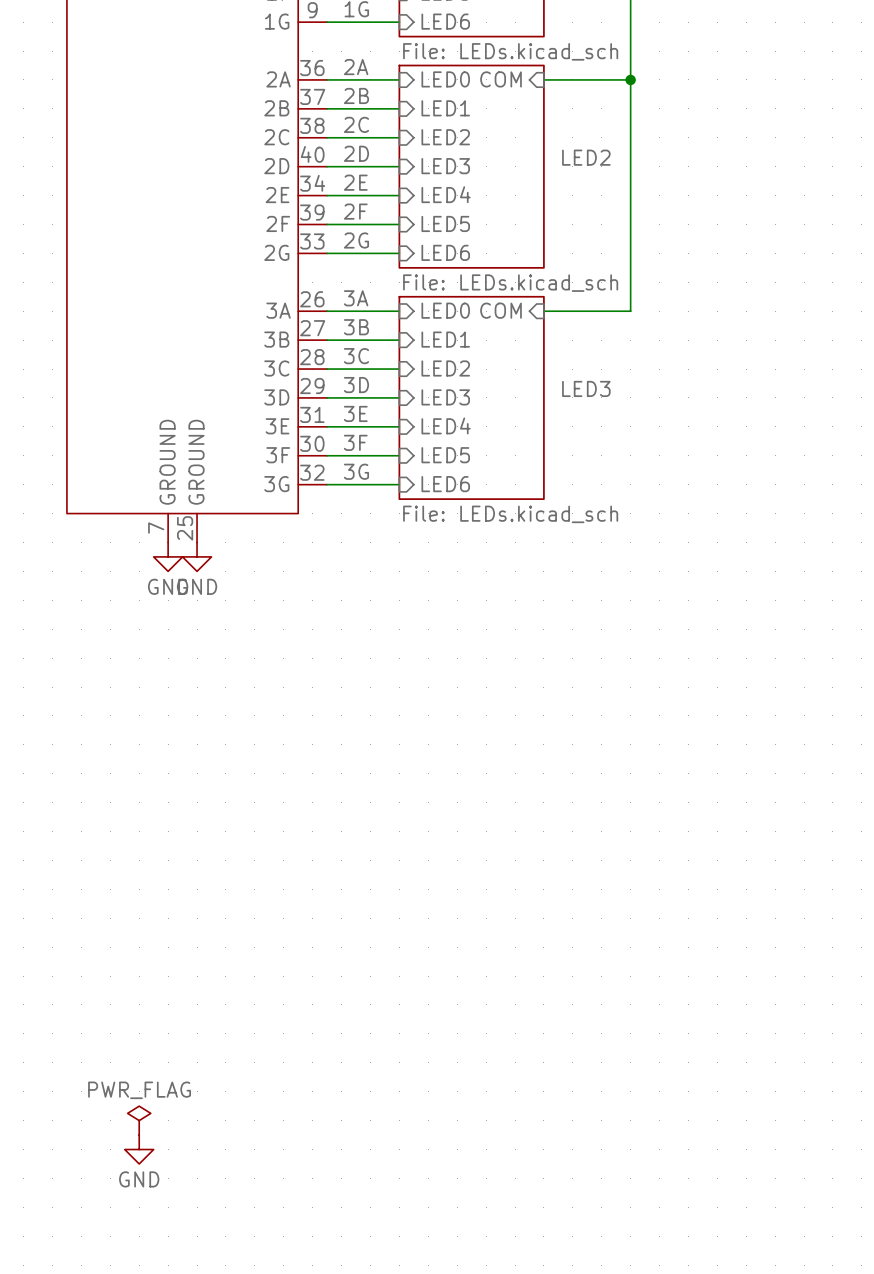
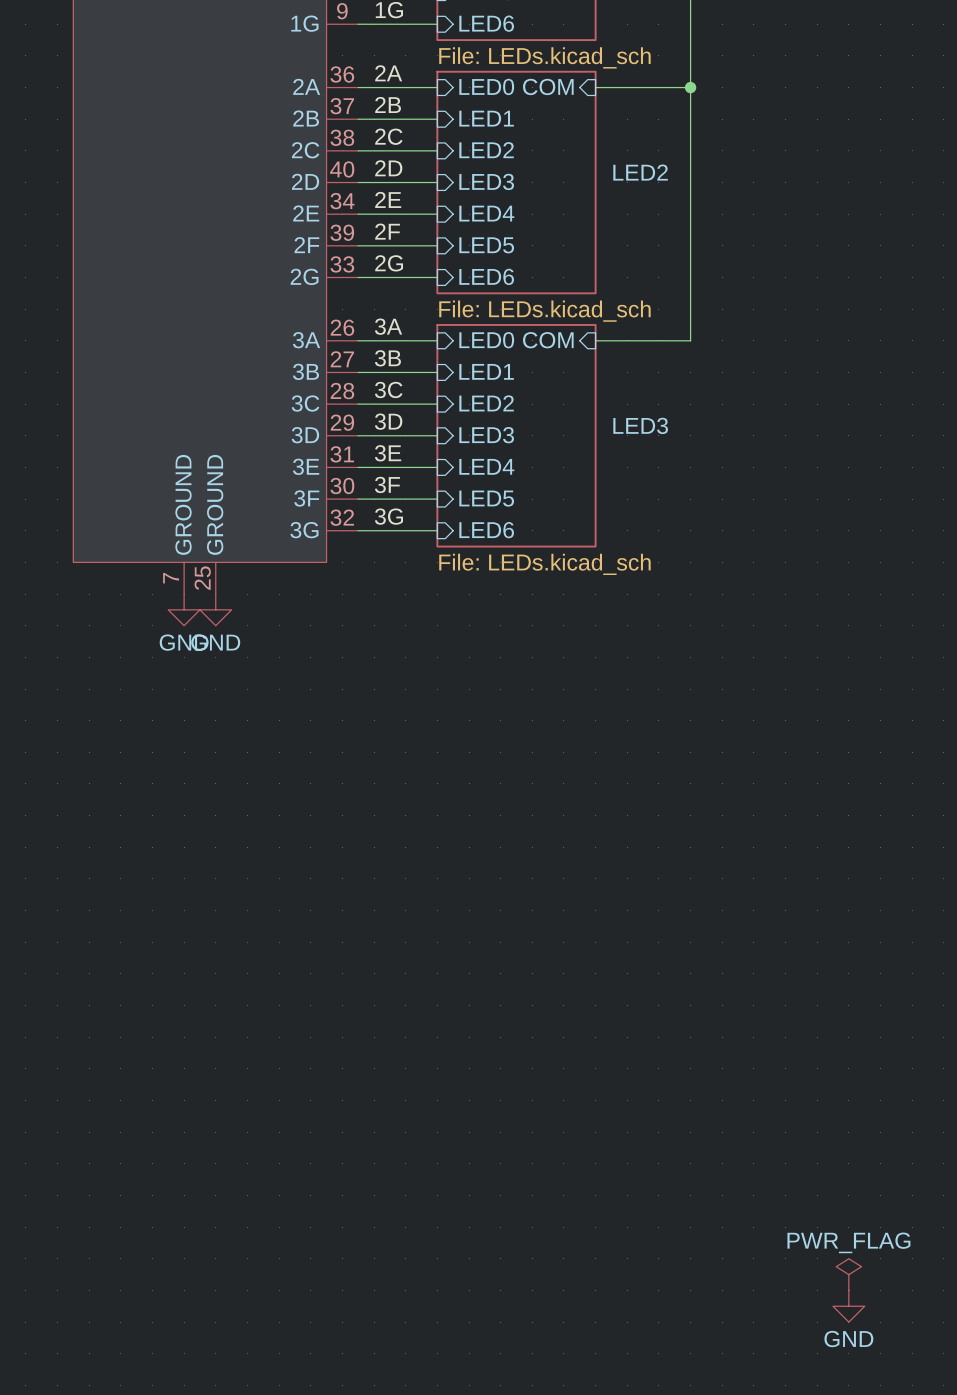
power symbol: PWR_FLAG (139, 1120) -> none
power symbol: GND (139, 1149) -> none
power symbol: none -> PWR_FLAG (848, 1274)
power symbol: none -> GND (848, 1306)

